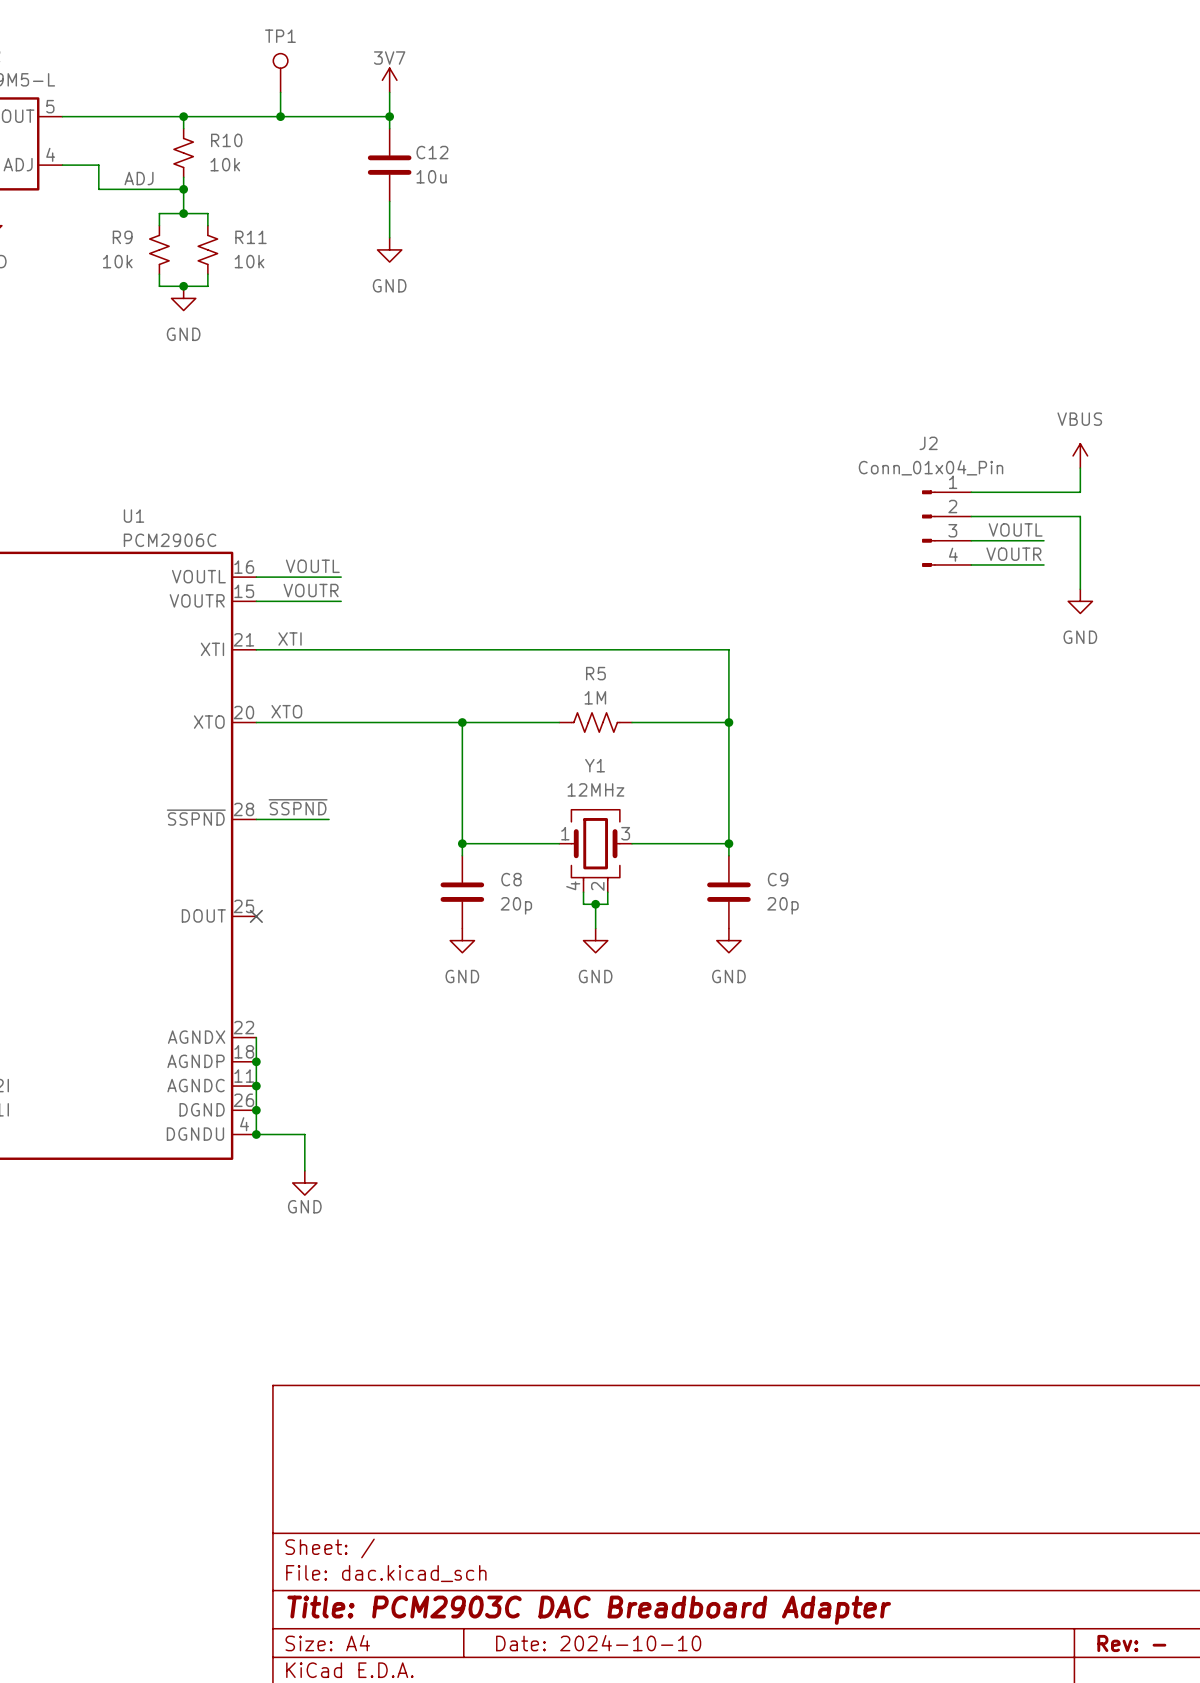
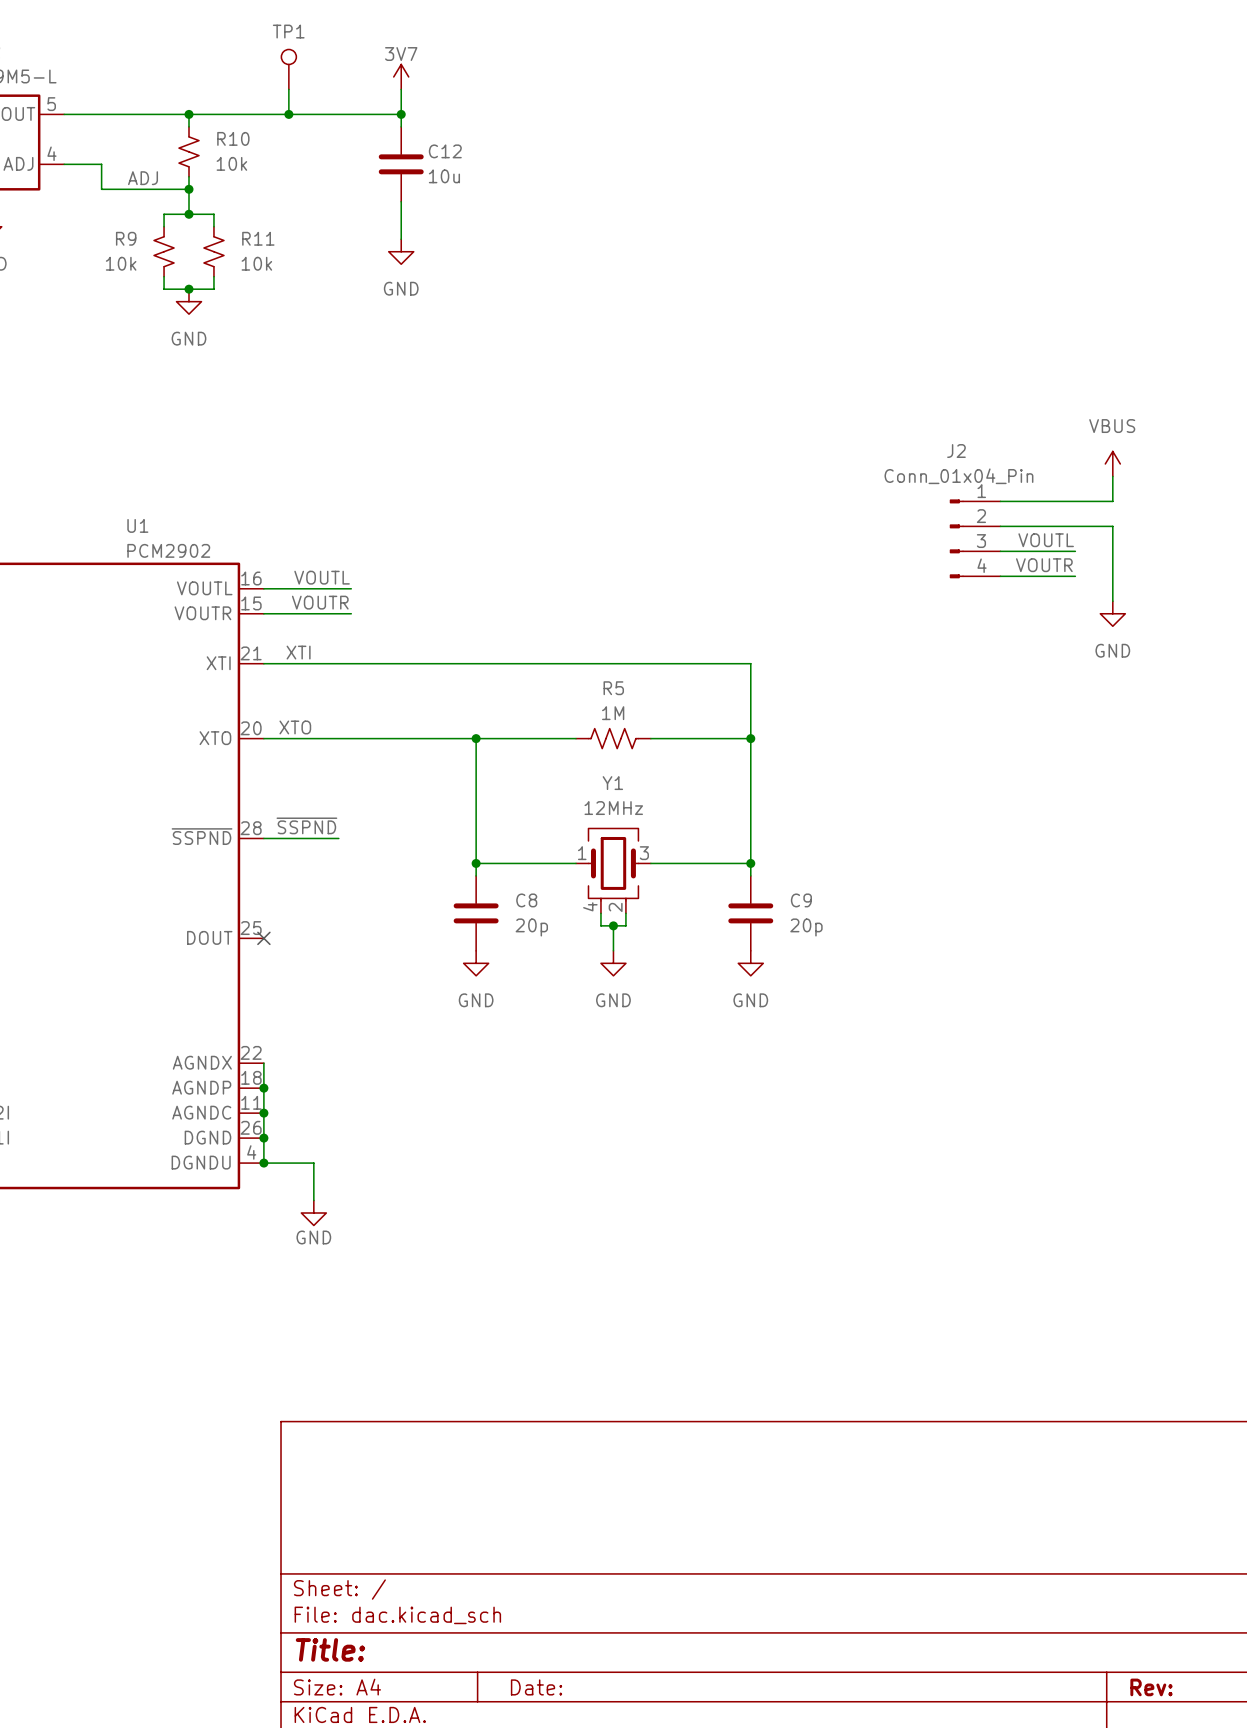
U1 value: PCM2906C (170, 540) -> PCM2902 (168, 550)
title block: Title: PCM2903C DAC Breadboard Adapter (589, 1610) -> Title: (330, 1649)
title block: Date: 2024-10-10 (598, 1643) -> Date: (536, 1687)
title block: Rev: - (1131, 1643) -> Rev: (1151, 1687)

